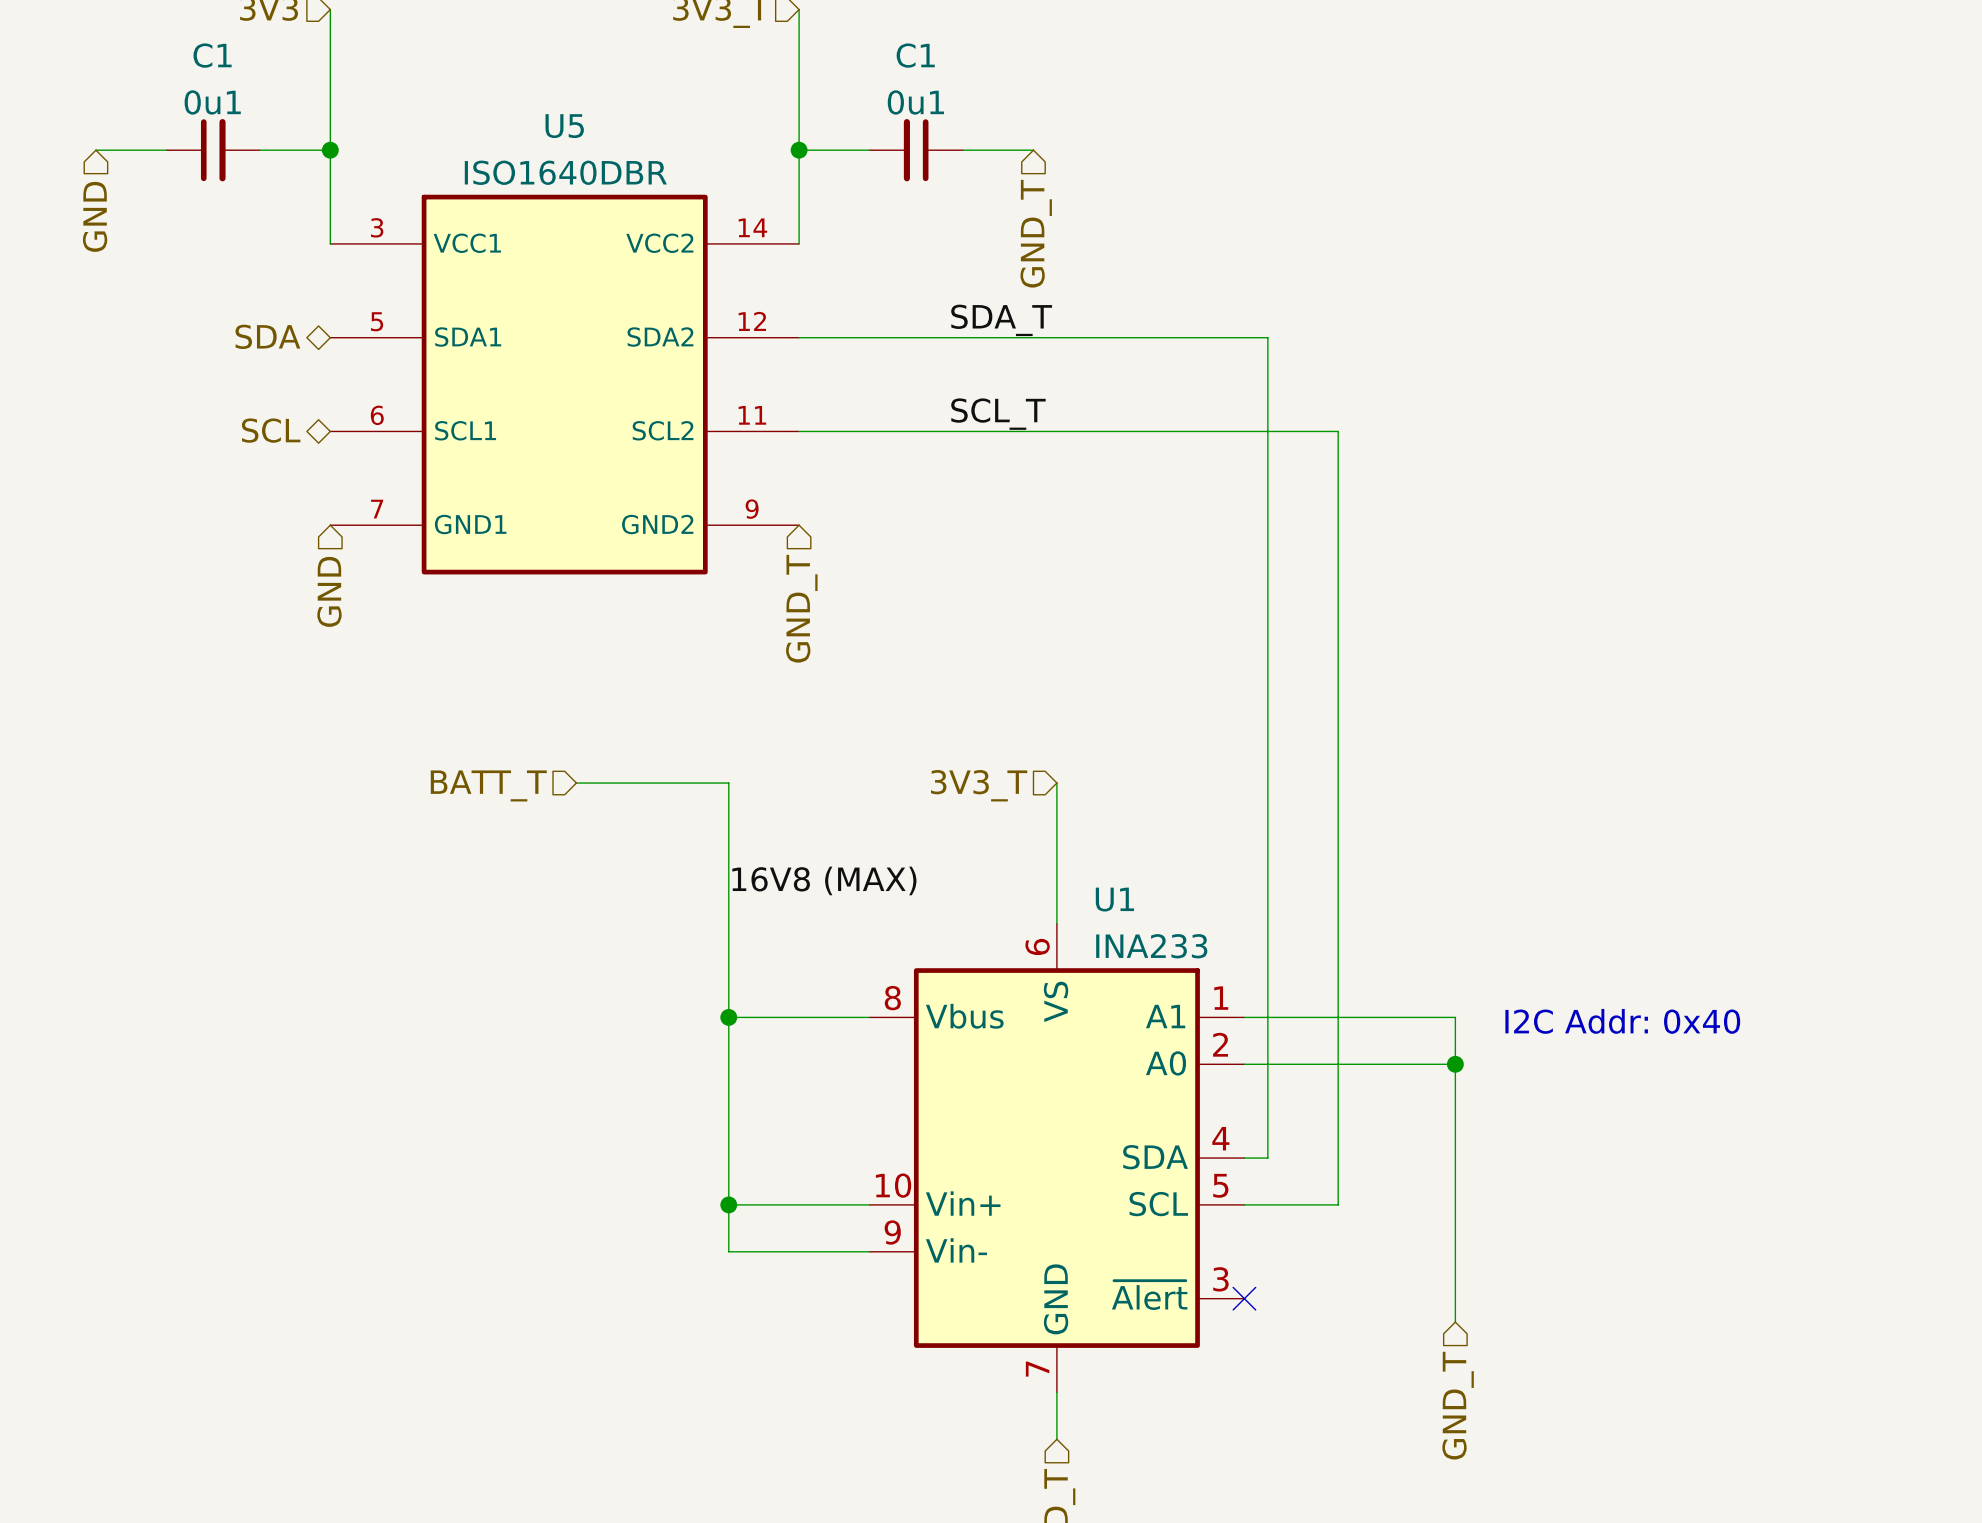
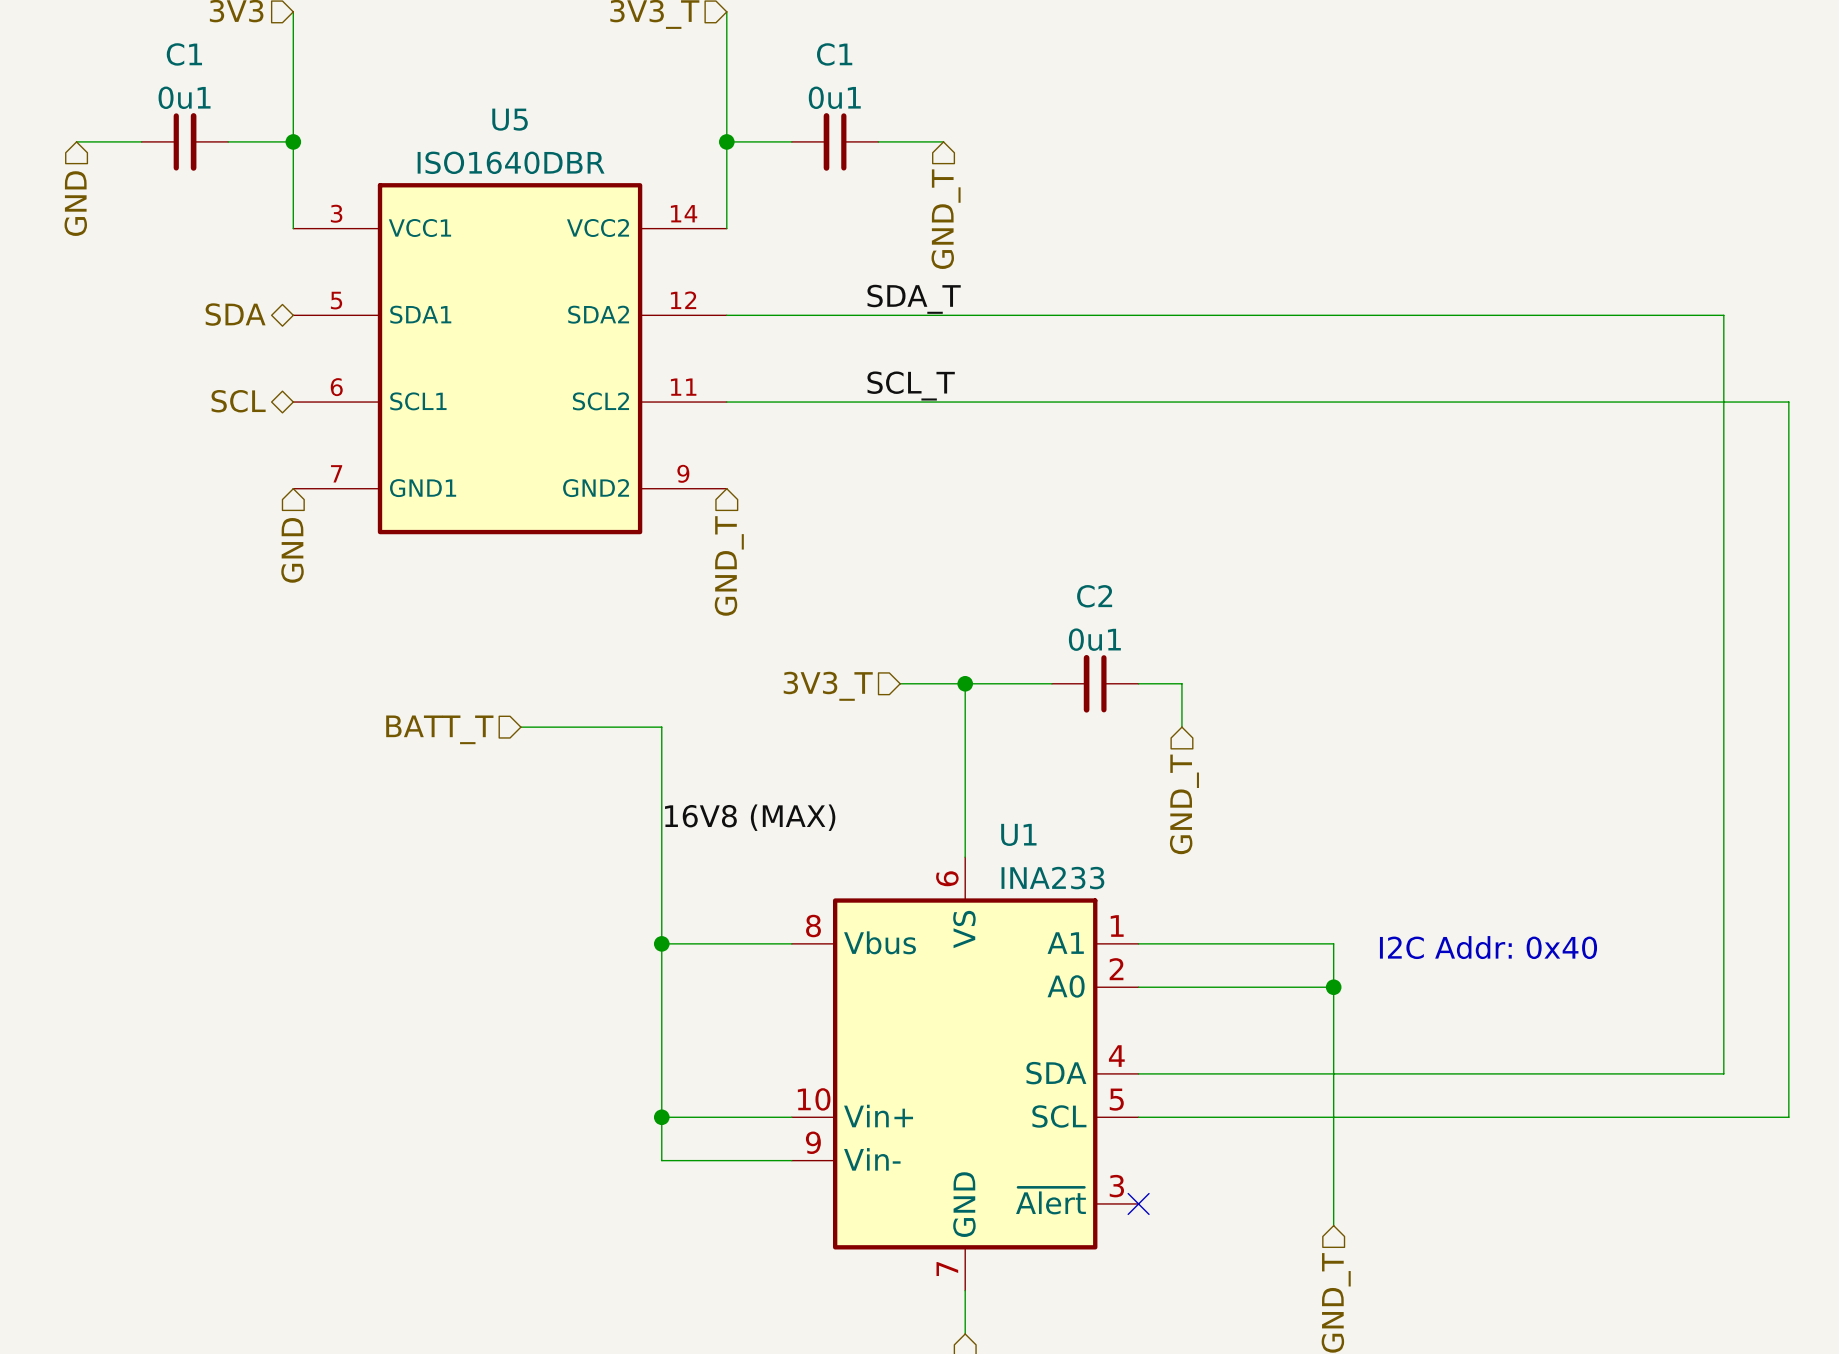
wire: (1267, 337) (1267, 1158) -> (1160, 315) (1723, 315) (1723, 1073) (1160, 1073)
wire: (1338, 431) (1338, 1204) -> (1225, 402) (1788, 402) (1788, 1117) (1225, 1117)
wire: none -> (900, 683) (1051, 683)
wire: none -> (965, 683) (965, 727)
junction: none -> (965, 683)
C2: none -> 0u1 (1095, 683)
wire: none -> (1138, 683) (1181, 683) (1181, 727)
hierarchical label position: 3V3_T (979, 785) -> 3V3_T (828, 686)
hierarchical label: none -> GND_T (1184, 804)

